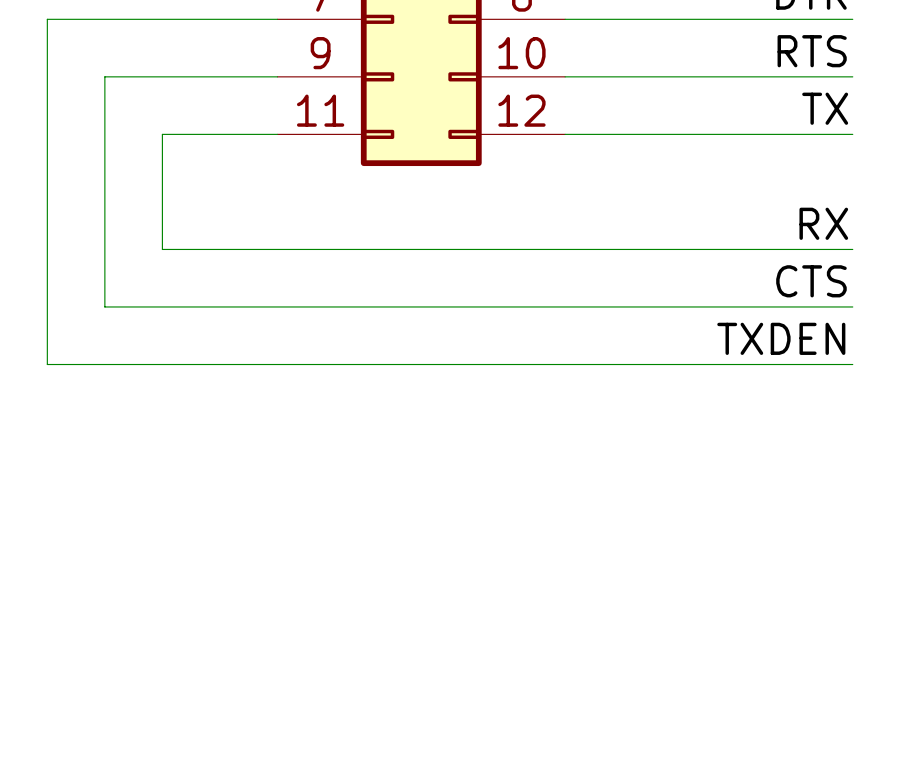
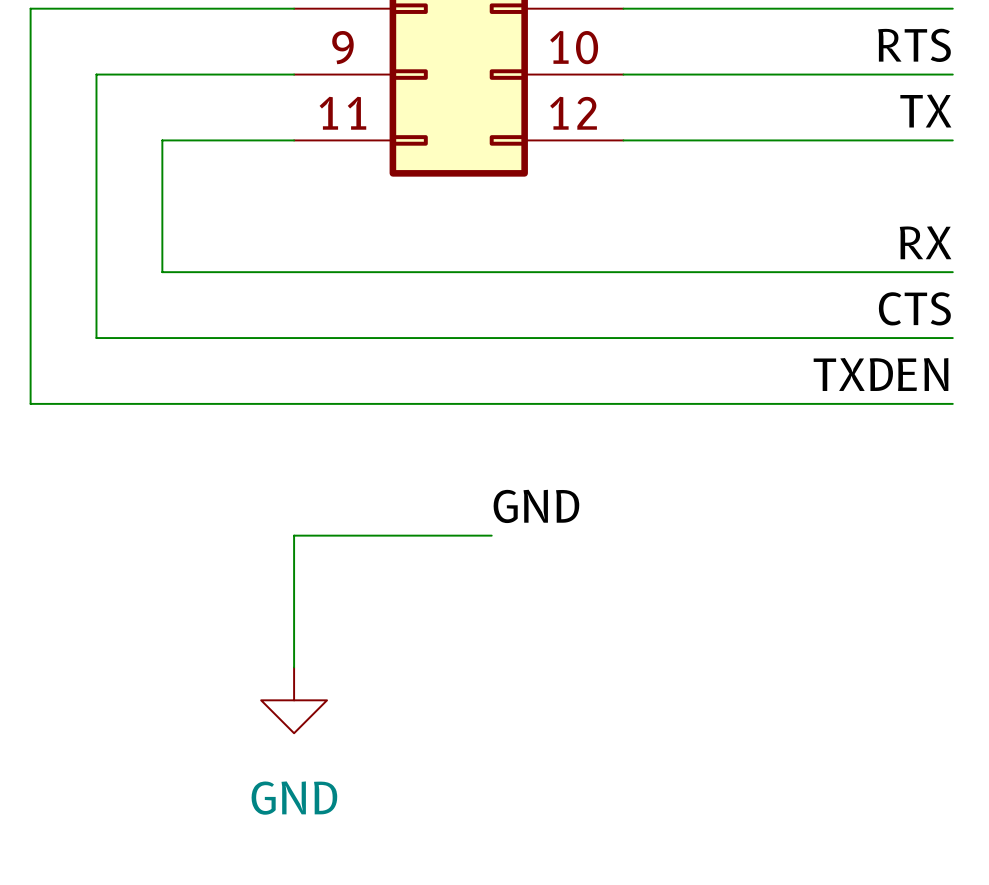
label: none -> GND (536, 506)
wire: none -> (491, 535) (294, 535) (294, 667)
power symbol: none -> GND (294, 700)

